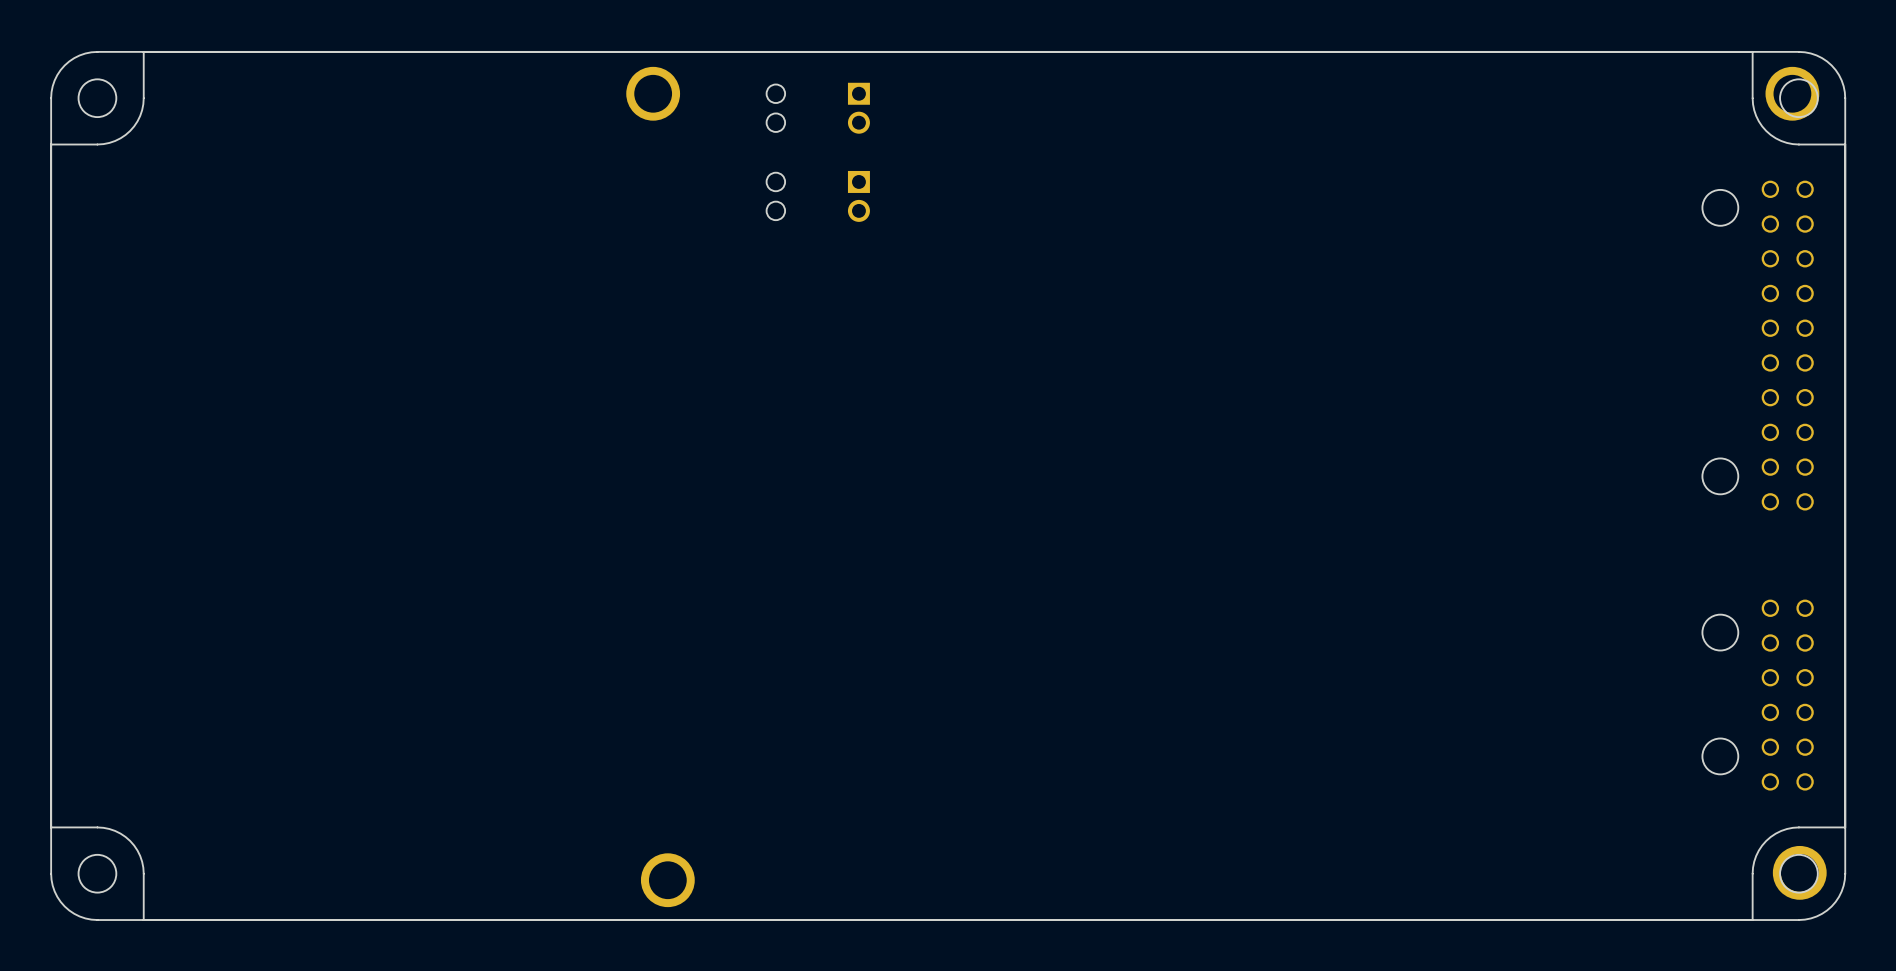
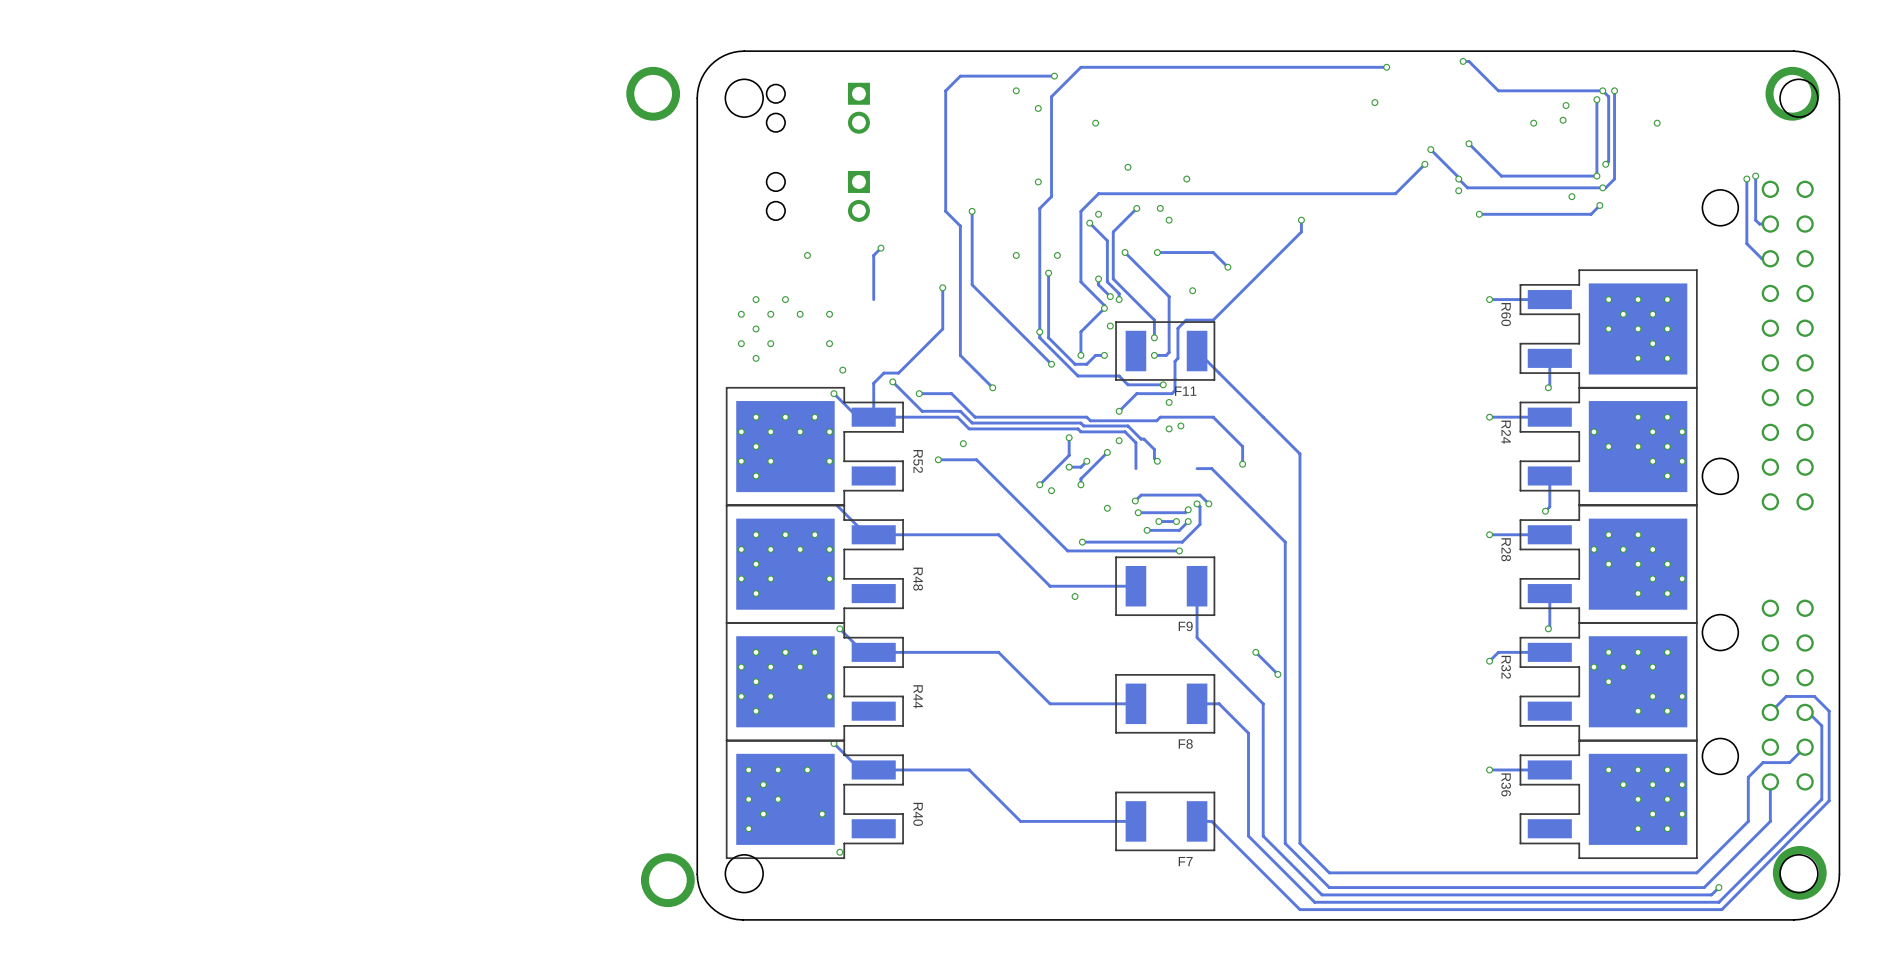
board edge: (143, 51) (143, 104) (137, 121) (130, 130) (115, 140) (103, 144) (51, 144) -> none
board edge: (1752, 51) (1753, 104) (1756, 115) (1766, 130) (1781, 140) (1792, 144) (1845, 144) -> none
board edge: (1798, 51) (97, 51) (79, 55) (69, 61) (57, 75) (52, 86) (51, 98) (51, 873) (54, 891) (60, 901) (74, 913) (85, 918) (97, 920) (1798, 920) (1816, 916) (1827, 910) (1835, 901) (1843, 885) (1845, 873) (1845, 98) (1841, 80) (1831, 65) (1816, 55) (1798, 51) -> (1793, 51) (744, 51) (728, 53) (714, 61) (701, 77) (697, 98) (697, 874) (698, 886) (706, 902) (720, 913) (731, 918) (742, 919) (1793, 919) (1805, 918) (1821, 910) (1833, 897) (1837, 886) (1839, 874) (1839, 94) (1835, 79) (1822, 62) (1809, 54) (1793, 51)
track: none -> (1463, 61) (1469, 61) (1498, 90) (1602, 90) (1608, 96) (1608, 161) (1605, 164)
via: none -> (1463, 61)
track: none -> (1386, 67) (1080, 67) (1051, 96) (1051, 196) (1039, 208) (1039, 337) (1077, 376) (1119, 376) (1127, 384) (1163, 384)
via: none -> (1386, 67)
track: none -> (1054, 76) (960, 76) (945, 90) (945, 211) (960, 226) (960, 355) (992, 387)
via: none -> (1054, 76)
round board edge: [77, 78, 117, 118] -> none
round board edge: none -> [724, 78, 764, 118]
via: none -> (1016, 90)
via: none -> (1602, 90)
track: none -> (1614, 90) (1614, 179) (1605, 187) (1467, 187) (1430, 149)
via: none -> (1614, 90)
track: none -> (1596, 99) (1596, 176) (1501, 176) (1469, 143)
via: none -> (1596, 99)
via: none -> (1374, 102)
via: none -> (1566, 105)
via: none -> (1038, 108)
via: none -> (1563, 120)
via: none -> (1095, 123)
via: none -> (1533, 123)
via: none -> (1657, 123)
via: none -> (1469, 143)
via: none -> (1430, 149)
track: none -> (1424, 164) (1395, 193) (1098, 193) (1080, 211) (1080, 281) (1104, 305) (1104, 308) (1080, 331) (1080, 355)
via: none -> (1424, 164)
via: none -> (1605, 164)
via: none -> (1127, 167)
via: none -> (1596, 176)
track: none -> (1755, 176) (1755, 220) (1759, 224) (1770, 224)
via: none -> (1755, 176)
via: none -> (1186, 179)
via: none -> (1458, 179)
track: none -> (1746, 179) (1746, 243) (1761, 258) (1770, 258)
via: none -> (1746, 179)
via: none -> (1038, 181)
via: none -> (1602, 187)
via: none -> (1458, 190)
via: none -> (1571, 196)
track: none -> (1599, 205) (1591, 214) (1479, 214)
via: none -> (1599, 205)
track: none -> (1136, 208) (1113, 231) (1113, 278) (1154, 320) (1154, 337)
via: none -> (1136, 208)
via: none -> (1160, 208)
track: none -> (972, 211) (972, 284) (1051, 364)
via: none -> (972, 211)
via: none -> (1098, 214)
via: none -> (1479, 214)
via: none -> (1169, 220)
track: none -> (1301, 220) (1301, 231) (1213, 320) (1186, 320) (1177, 328) (1175, 390) (1172, 393) (1136, 393) (1119, 411)
via: none -> (1301, 220)
track: none -> (1089, 223) (1107, 240) (1107, 281) (1119, 293) (1119, 299)
via: none -> (1089, 223)
track: none -> (881, 248) (873, 255) (873, 299)
via: none -> (881, 248)
track: none -> (1125, 252) (1169, 296) (1169, 352) (1166, 355) (1154, 355)
via: none -> (1125, 252)
track: none -> (1157, 252) (1213, 252) (1227, 267)
via: none -> (1157, 252)
via: none -> (807, 255)
via: none -> (1016, 255)
via: none -> (1057, 255)
via: none -> (1227, 267)
track: none -> (1048, 273) (1048, 337) (1075, 364) (1086, 364) (1095, 355) (1104, 355)
via: none -> (1048, 273)
track: none -> (1098, 278) (1098, 284) (1110, 296)
via: none -> (1098, 278)
track: none -> (942, 287) (942, 328) (898, 373) (883, 373) (873, 383) (873, 417)
via: none -> (942, 287)
via: none -> (1192, 290)
via: none -> (1110, 296)
via: none -> (756, 299)
via: none -> (785, 299)
via: none -> (1119, 299)
via: none -> (1489, 299)
track: none -> (1549, 299) (1489, 299)
via: none -> (1608, 299)
via: none -> (1638, 299)
via: none -> (1667, 299)
via: none -> (1104, 308)
via: none -> (741, 314)
via: none -> (770, 314)
via: none -> (800, 314)
via: none -> (829, 314)
via: none -> (1623, 314)
via: none -> (1652, 314)
via: none -> (1110, 326)
via: none -> (756, 328)
R60: none -> (1608, 328)
via: none -> (1608, 328)
via: none -> (1638, 328)
via: none -> (1667, 328)
via: none -> (1039, 331)
via: none -> (1154, 337)
via: none -> (741, 343)
via: none -> (770, 343)
via: none -> (829, 343)
via: none -> (1652, 343)
F11: none -> (1165, 351)
track: none -> (1197, 351) (1299, 453) (1299, 843) (1329, 872) (1696, 872) (1748, 821) (1748, 777) (1763, 762) (1789, 762) (1805, 747)
via: none -> (1080, 355)
via: none -> (1104, 355)
via: none -> (1154, 355)
via: none -> (756, 358)
track: none -> (1549, 358) (1548, 387)
via: none -> (1638, 358)
via: none -> (1667, 358)
via: none -> (1051, 364)
via: none -> (842, 370)
track: none -> (892, 381) (922, 411) (960, 411) (972, 423) (1080, 423) (1083, 425) (1127, 425) (1154, 449) (1154, 458) (1157, 461)
via: none -> (892, 381)
via: none -> (1163, 384)
via: none -> (992, 387)
via: none -> (1548, 387)
track: none -> (833, 393) (857, 417) (957, 417) (969, 428) (1077, 428) (1080, 431) (1125, 431) (1135, 442) (1135, 468)
via: none -> (833, 393)
track: none -> (919, 393) (951, 393) (975, 417) (1086, 417) (1090, 420) (1156, 420) (1160, 417) (1213, 417) (1242, 446) (1242, 464)
via: none -> (919, 393)
via: none -> (1169, 402)
via: none -> (1119, 411)
via: none -> (756, 417)
via: none -> (785, 417)
via: none -> (814, 417)
via: none -> (1489, 417)
track: none -> (1549, 417) (1489, 417)
via: none -> (1638, 417)
via: none -> (1667, 417)
via: none -> (1180, 425)
via: none -> (1169, 428)
via: none -> (741, 431)
via: none -> (770, 431)
via: none -> (800, 431)
via: none -> (829, 431)
via: none -> (1593, 431)
via: none -> (1652, 431)
via: none -> (1682, 431)
track: none -> (1069, 437) (1069, 455) (1039, 484)
via: none -> (1069, 437)
via: none -> (1119, 440)
via: none -> (963, 443)
via: none -> (756, 446)
R52: none -> (814, 446)
R24: none -> (1608, 446)
via: none -> (1608, 446)
via: none -> (1638, 446)
via: none -> (1667, 446)
track: none -> (1107, 452) (1080, 478) (1080, 484)
via: none -> (1107, 452)
track: none -> (938, 459) (976, 459) (1067, 550) (1179, 550)
via: none -> (938, 459)
via: none -> (741, 461)
via: none -> (770, 461)
via: none -> (829, 461)
track: none -> (1086, 461) (1080, 467) (1069, 467)
via: none -> (1086, 461)
via: none -> (1157, 461)
via: none -> (1652, 461)
via: none -> (1682, 461)
via: none -> (1242, 464)
via: none -> (1069, 467)
track: none -> (1197, 468) (1211, 468) (1285, 542) (1285, 843) (1329, 887) (1704, 887) (1770, 821) (1770, 781)
via: none -> (756, 475)
track: none -> (1549, 475) (1549, 506) (1545, 511)
via: none -> (1667, 475)
via: none -> (1039, 484)
via: none -> (1080, 484)
via: none -> (1051, 490)
track: none -> (1135, 500) (1141, 495) (1200, 495) (1208, 503)
via: none -> (1135, 500)
track: none -> (1197, 503) (1200, 506) (1200, 524) (1182, 542) (1082, 542)
via: none -> (1197, 503)
via: none -> (1208, 503)
track: none -> (836, 505) (866, 534) (998, 534) (1050, 586) (1135, 586)
via: none -> (1107, 508)
track: none -> (1188, 509) (1185, 512) (1138, 512)
via: none -> (1188, 509)
via: none -> (1545, 511)
via: none -> (1138, 512)
via: none -> (1158, 521)
track: none -> (1176, 521) (1158, 521)
via: none -> (1176, 521)
track: none -> (1188, 521) (1179, 530) (1147, 530)
via: none -> (1188, 521)
via: none -> (1147, 530)
via: none -> (756, 534)
via: none -> (785, 534)
via: none -> (814, 534)
via: none -> (1489, 534)
track: none -> (1549, 534) (1489, 534)
via: none -> (1608, 534)
via: none -> (1638, 534)
via: none -> (1082, 542)
via: none -> (741, 549)
via: none -> (770, 549)
via: none -> (800, 549)
via: none -> (829, 549)
via: none -> (1593, 549)
via: none -> (1623, 549)
via: none -> (1652, 549)
via: none -> (1179, 550)
via: none -> (756, 564)
R48: none -> (814, 564)
R28: none -> (1608, 564)
via: none -> (1608, 564)
via: none -> (1638, 564)
via: none -> (1667, 564)
via: none -> (741, 578)
via: none -> (770, 578)
via: none -> (829, 578)
via: none -> (1652, 578)
via: none -> (1682, 578)
F9: none -> (1165, 586)
via: none -> (756, 593)
track: none -> (1549, 593) (1548, 628)
via: none -> (1638, 593)
via: none -> (1667, 593)
via: none -> (1075, 596)
track: none -> (1197, 600) (1197, 637) (1263, 703) (1263, 836) (1322, 894) (1711, 894) (1718, 887)
track: none -> (839, 628) (863, 652) (998, 652) (1050, 703) (1135, 703)
via: none -> (839, 628)
via: none -> (1548, 628)
via: none -> (756, 652)
via: none -> (785, 652)
via: none -> (814, 652)
track: none -> (1255, 652) (1277, 674)
via: none -> (1255, 652)
track: none -> (1549, 652) (1498, 652) (1489, 661)
via: none -> (1608, 652)
via: none -> (1638, 652)
via: none -> (1667, 652)
via: none -> (1489, 661)
via: none -> (741, 667)
via: none -> (770, 667)
via: none -> (800, 667)
via: none -> (1593, 667)
via: none -> (1623, 667)
via: none -> (1652, 667)
via: none -> (1277, 674)
via: none -> (756, 681)
R44: none -> (814, 681)
R32: none -> (1608, 681)
via: none -> (1608, 681)
via: none -> (741, 696)
via: none -> (770, 696)
via: none -> (829, 696)
via: none -> (1652, 696)
via: none -> (1682, 696)
F8: none -> (1165, 703)
track: none -> (1197, 703) (1219, 703) (1248, 733) (1248, 836) (1314, 902) (1718, 902) (1821, 799) (1821, 725) (1808, 712) (1805, 712)
via: none -> (756, 711)
via: none -> (1638, 711)
via: none -> (1667, 711)
track: none -> (1770, 712) (1786, 696) (1814, 696) (1829, 711) (1829, 800) (1721, 909) (1299, 909) (1211, 821) (1197, 821)
track: none -> (833, 743) (860, 769) (969, 769) (1020, 821) (1135, 821)
via: none -> (833, 743)
via: none -> (748, 769)
via: none -> (778, 769)
via: none -> (807, 769)
via: none -> (1489, 769)
track: none -> (1549, 769) (1489, 769)
via: none -> (1608, 769)
via: none -> (1638, 769)
via: none -> (1667, 769)
via: none -> (763, 784)
via: none -> (1623, 784)
via: none -> (1652, 784)
via: none -> (1682, 784)
via: none -> (748, 799)
via: none -> (778, 799)
R40: none -> (814, 799)
R36: none -> (1608, 799)
via: none -> (1638, 799)
via: none -> (1667, 799)
via: none -> (763, 814)
via: none -> (822, 814)
via: none -> (1652, 814)
via: none -> (1682, 814)
F7: none -> (1165, 821)
board edge: (51, 827) (103, 827) (120, 833) (130, 840) (137, 850) (143, 867) (143, 920) -> none
board edge: (1845, 827) (1792, 827) (1775, 833) (1766, 840) (1756, 856) (1753, 867) (1752, 920) -> none
via: none -> (748, 828)
via: none -> (1638, 828)
via: none -> (1667, 828)
via: none -> (839, 852)
round board edge: [77, 854, 117, 894] -> none
round board edge: none -> [724, 854, 764, 894]
via: none -> (1718, 887)

